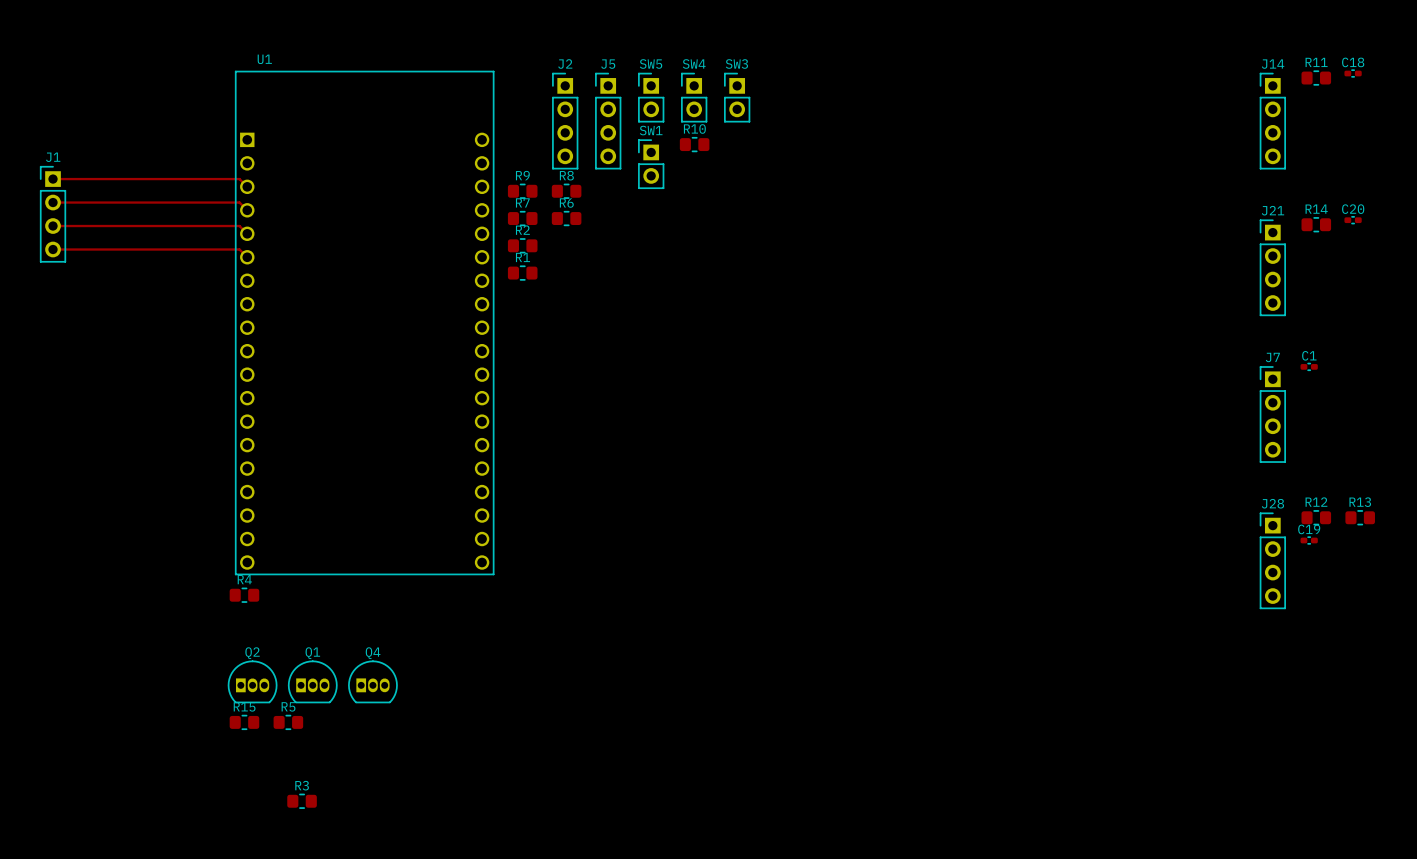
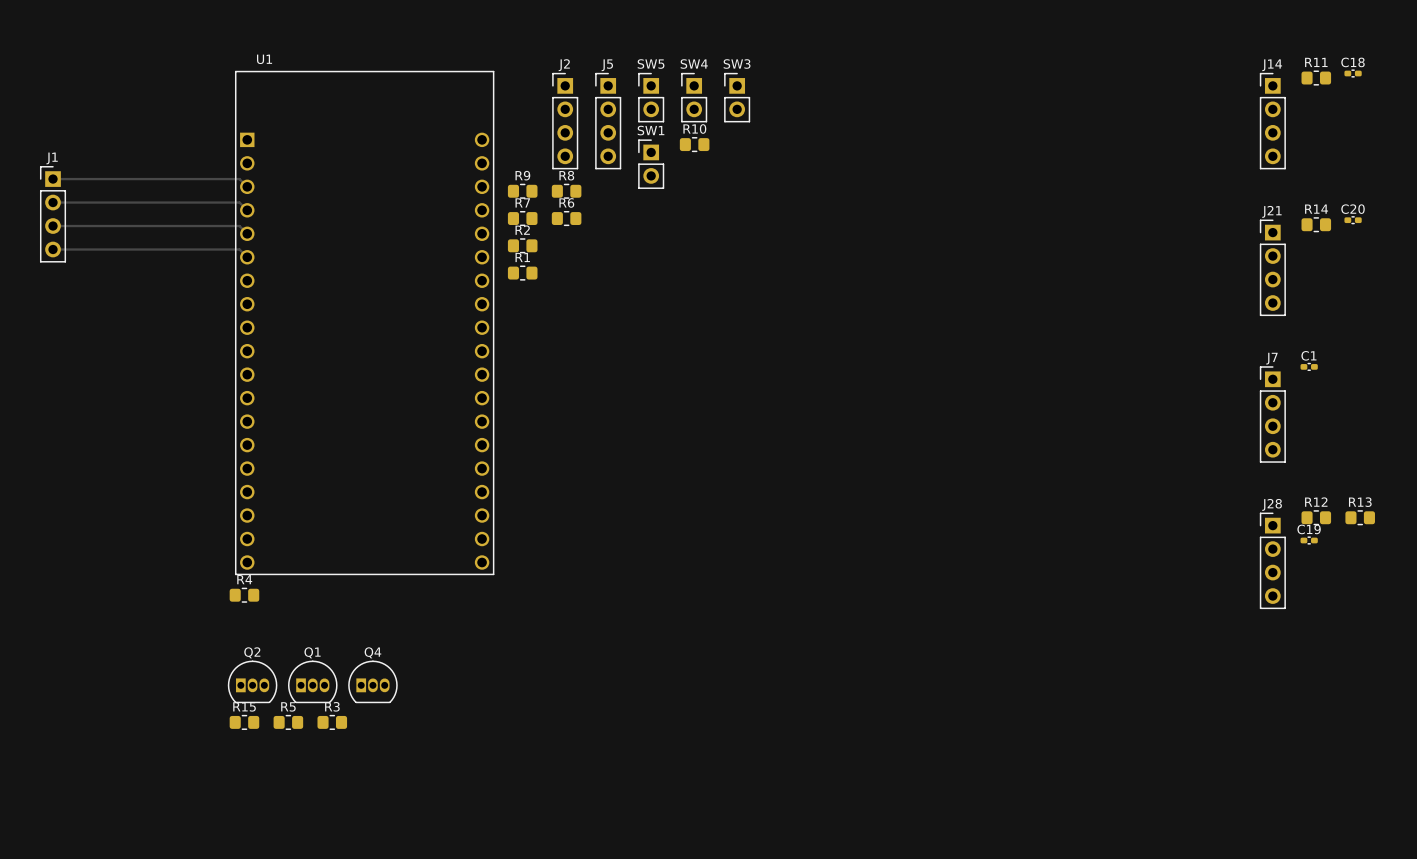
R3 position: (302, 801) -> (332, 722)

